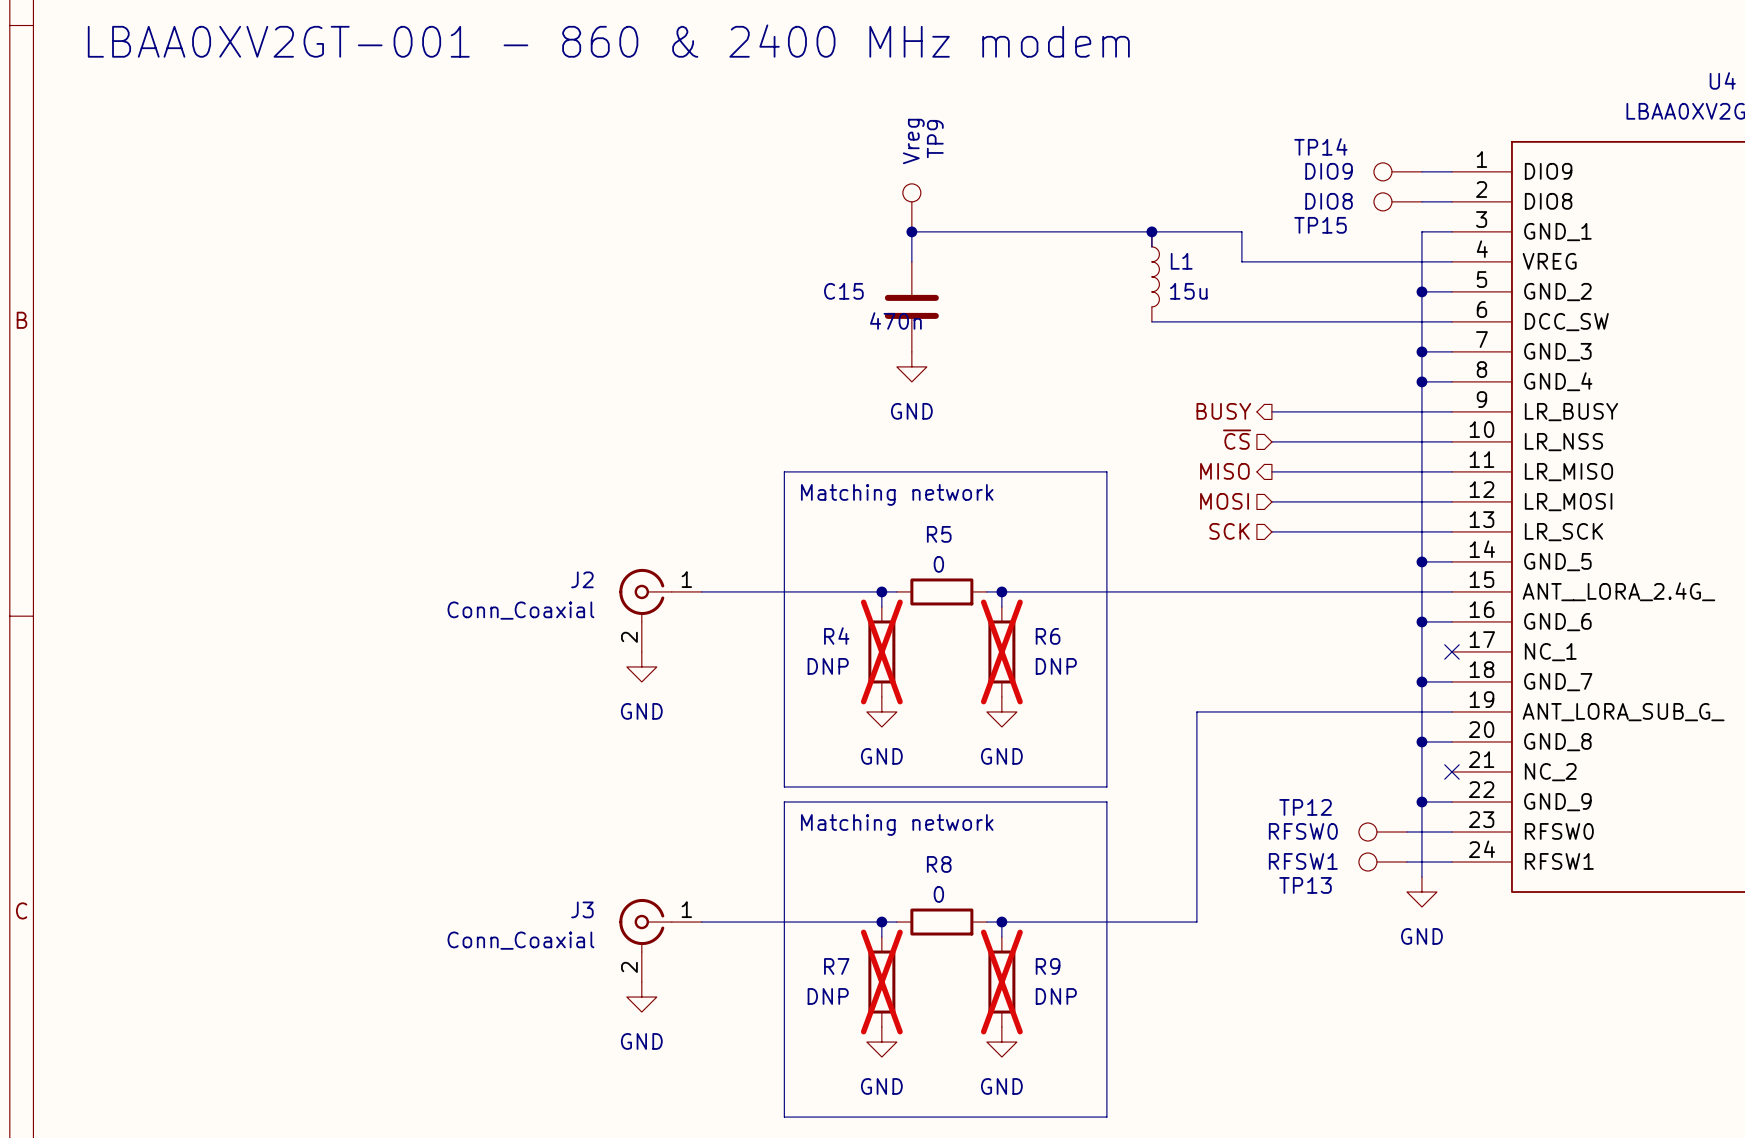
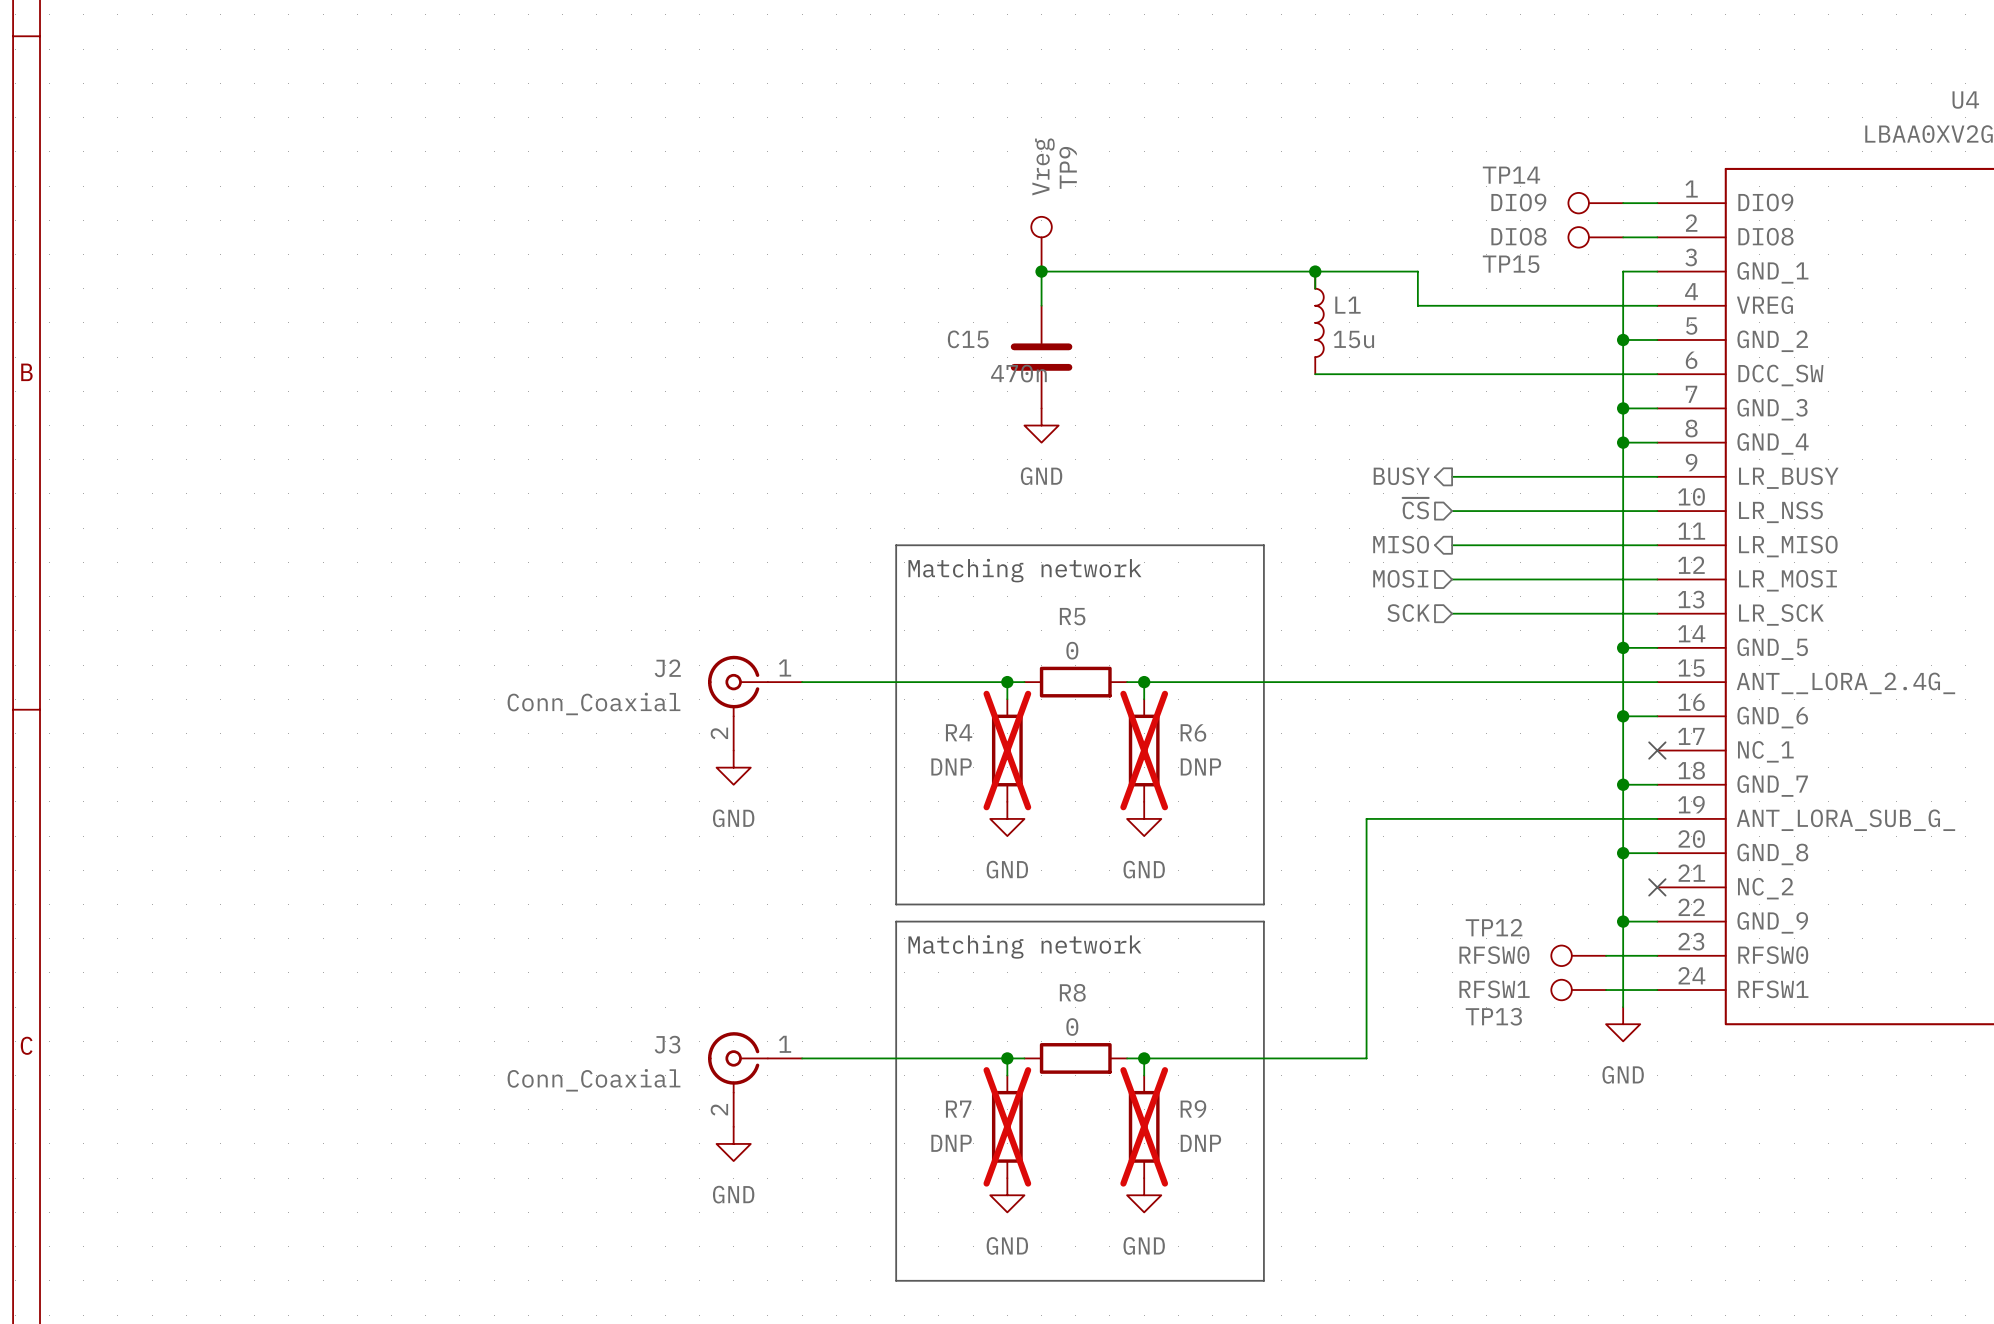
text: LBAA0XV2GT-001 - 860 & 2400 MHz modem (608, 41) -> none

